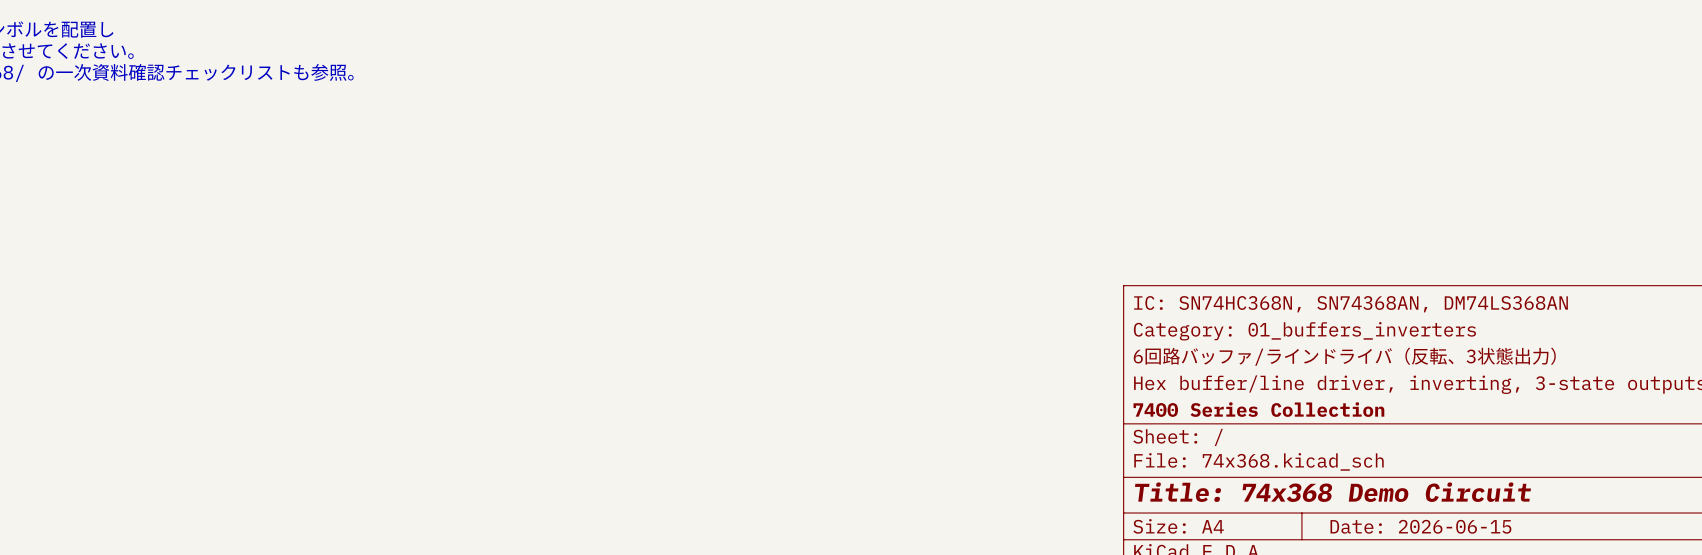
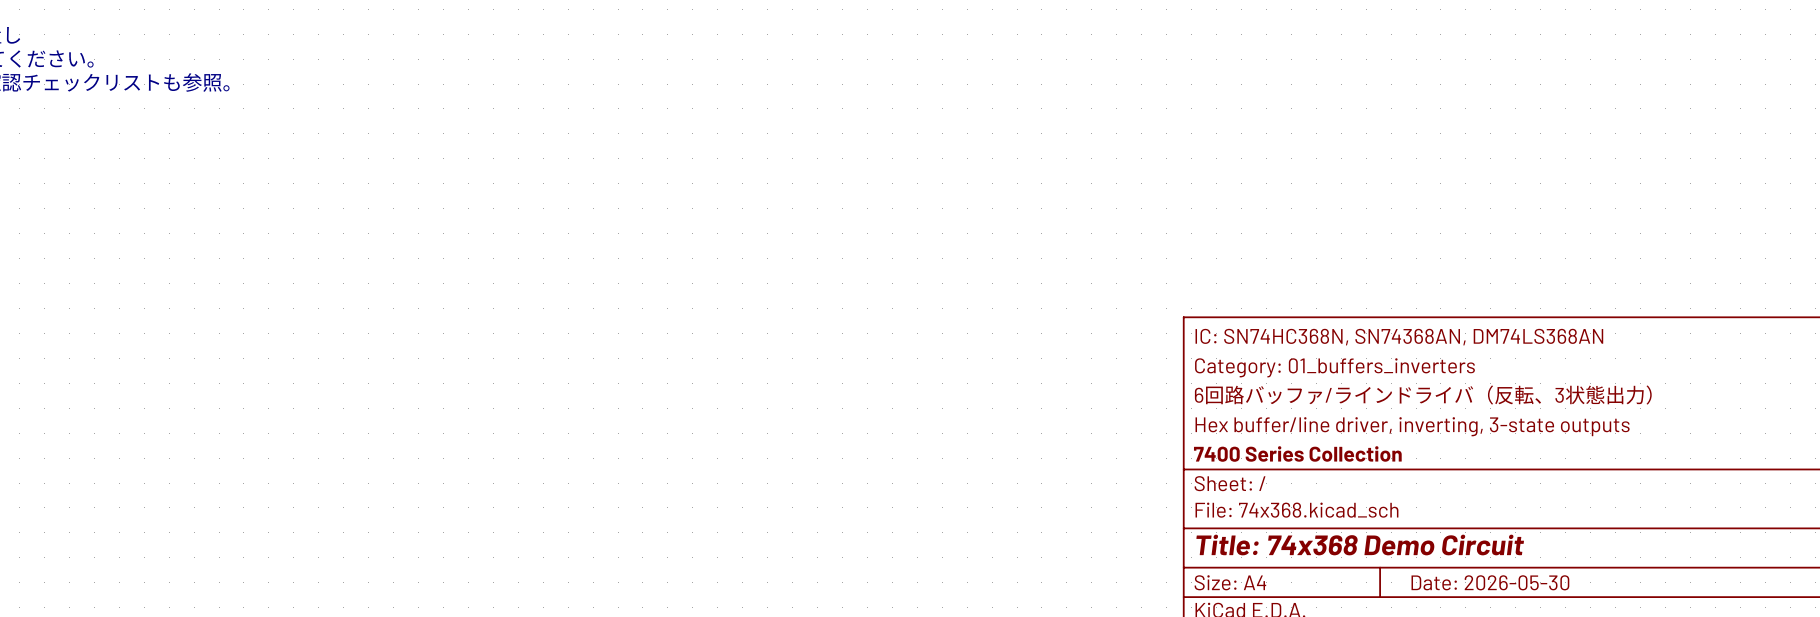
title block: Date: 2026-06-15 (1420, 526) -> Date: 2026-05-30 (1490, 582)

